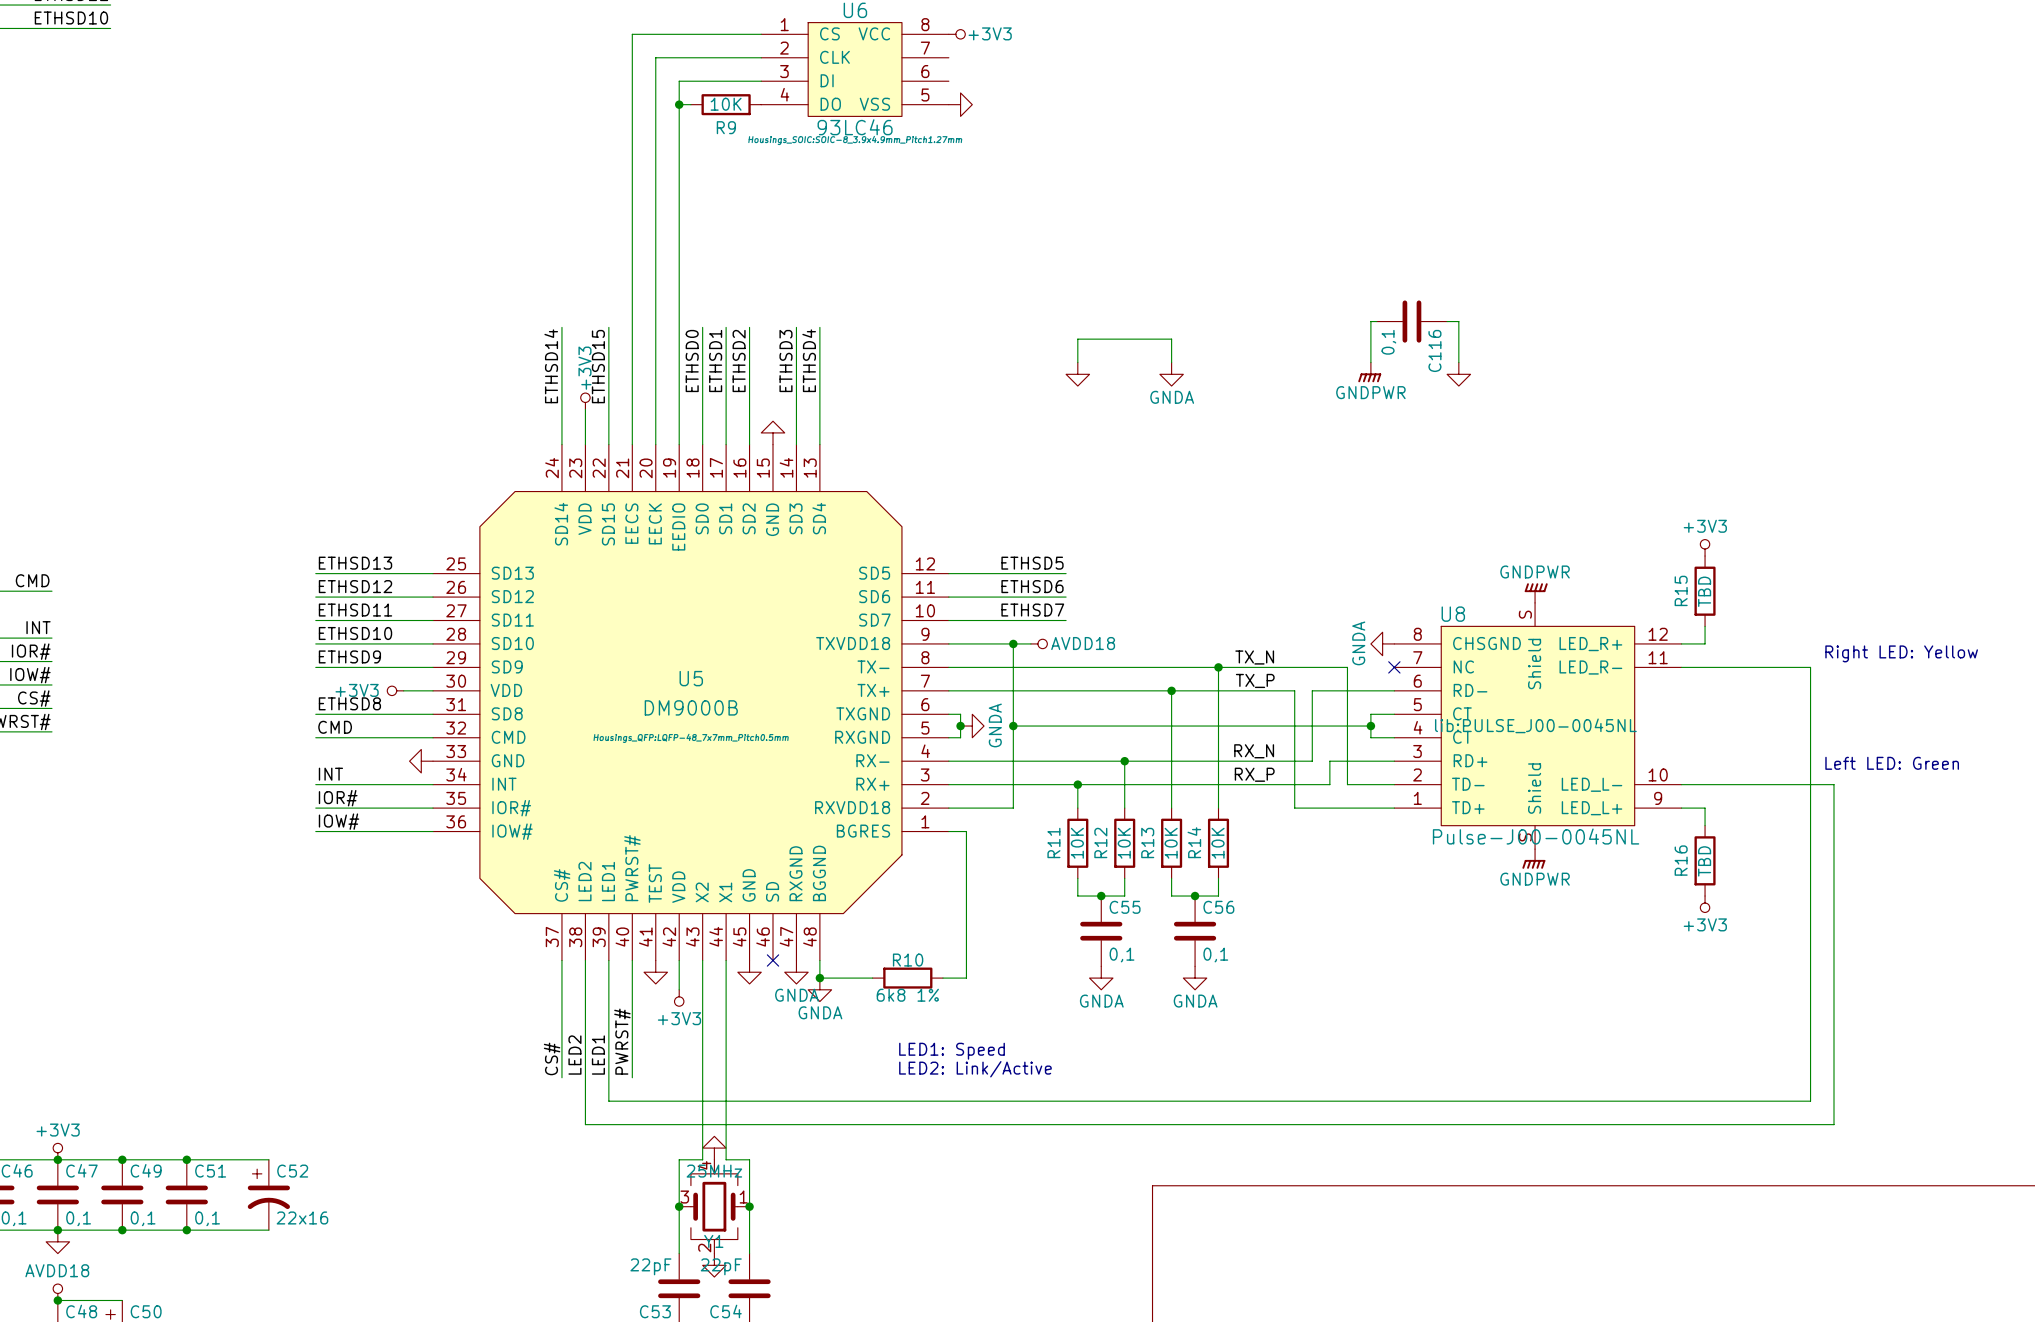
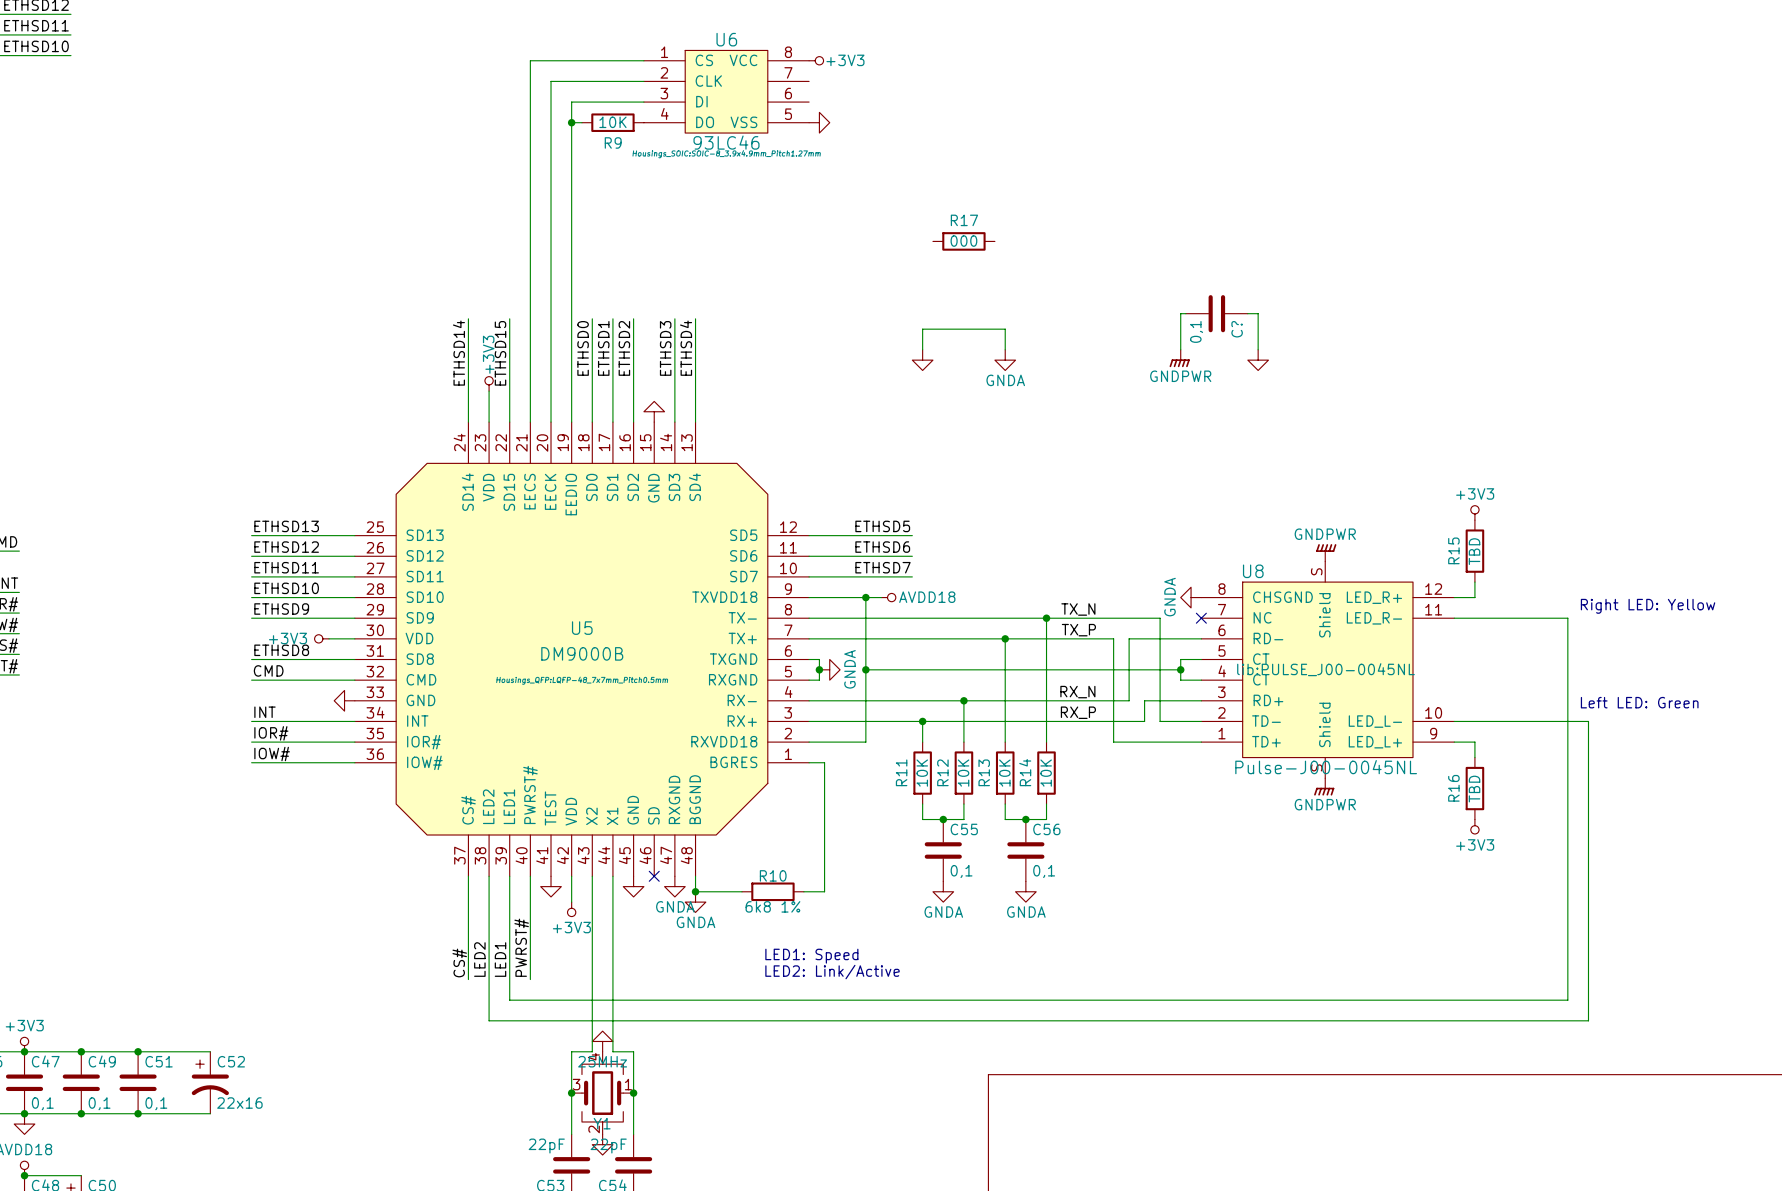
R17: none -> 000 (963, 241)
C116 name: C116 (1434, 350) -> C? (1237, 329)

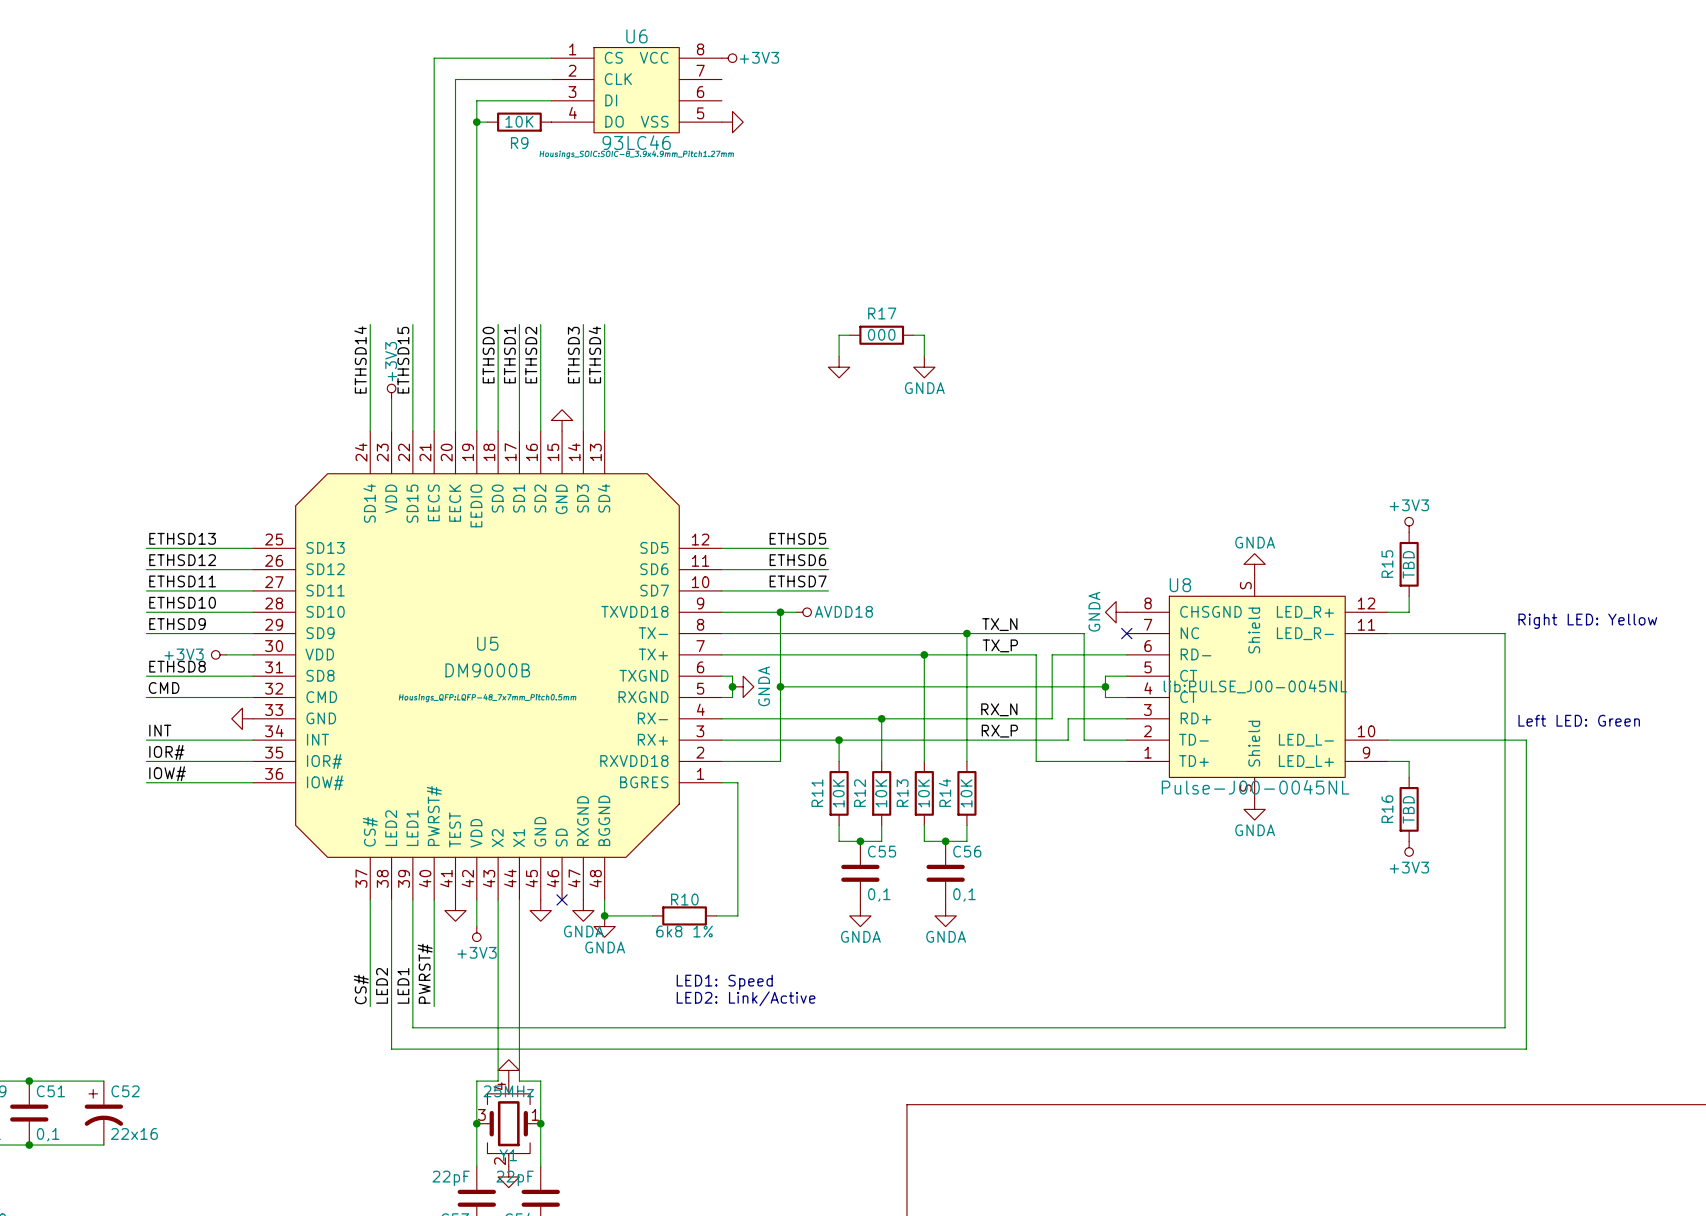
R17 position: (963, 241) -> (881, 335)
wire: (1185, 313) (1180, 313) (1180, 349) -> none
C?: 0,1 (1216, 313) -> none
wire: (1247, 313) (1258, 313) (1258, 349) -> none
wire: (932, 329) (994, 329) -> none
power symbol: GNDPWR (1179, 358) -> none
power symbol: (1258, 360) -> none
power symbol: GNDPWR (1326, 552) -> GNDA (1254, 564)
power symbol: GNDPWR (1324, 786) -> GNDA (1254, 809)

